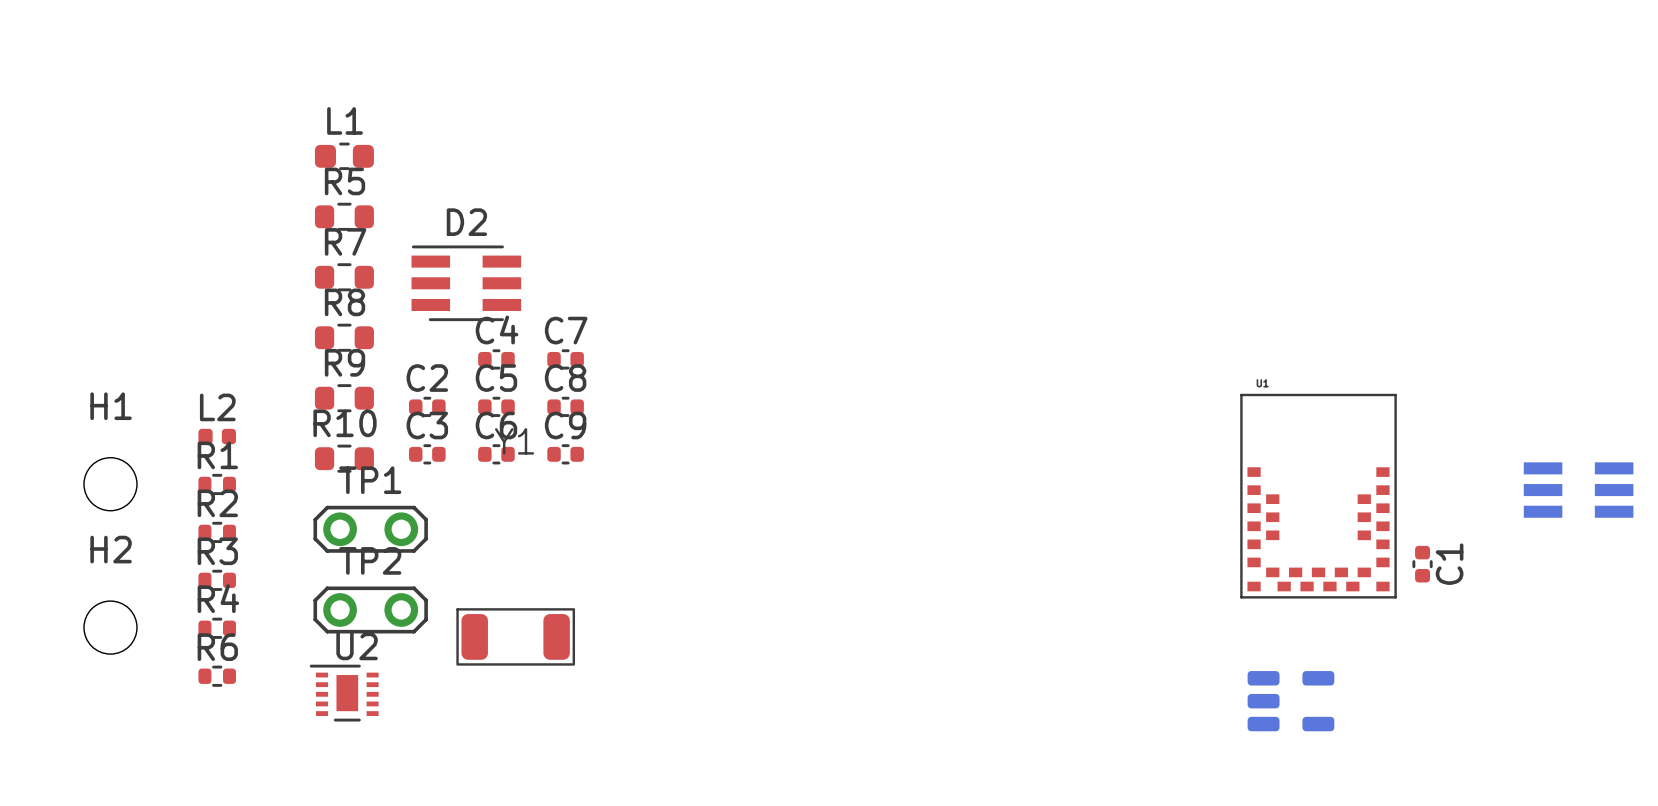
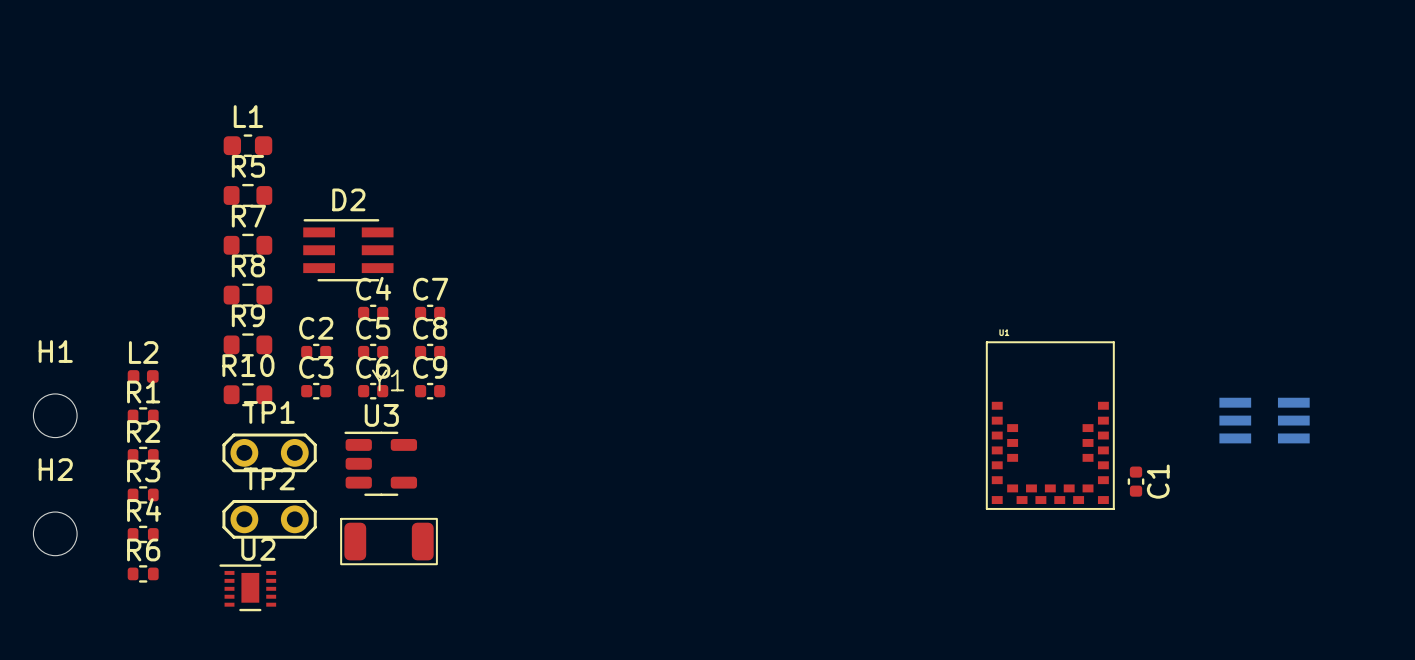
U3: none -> (380, 463)
part: (1290, 701) -> none

